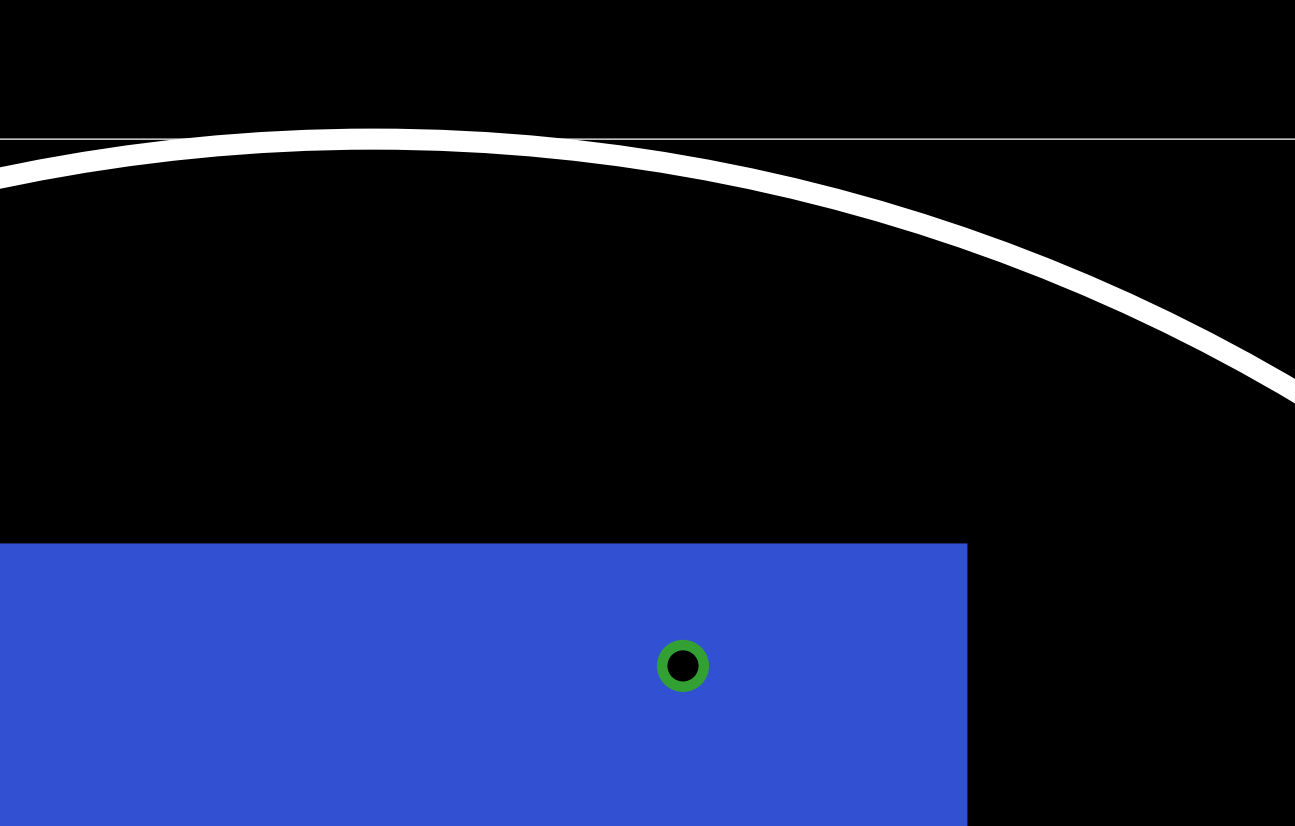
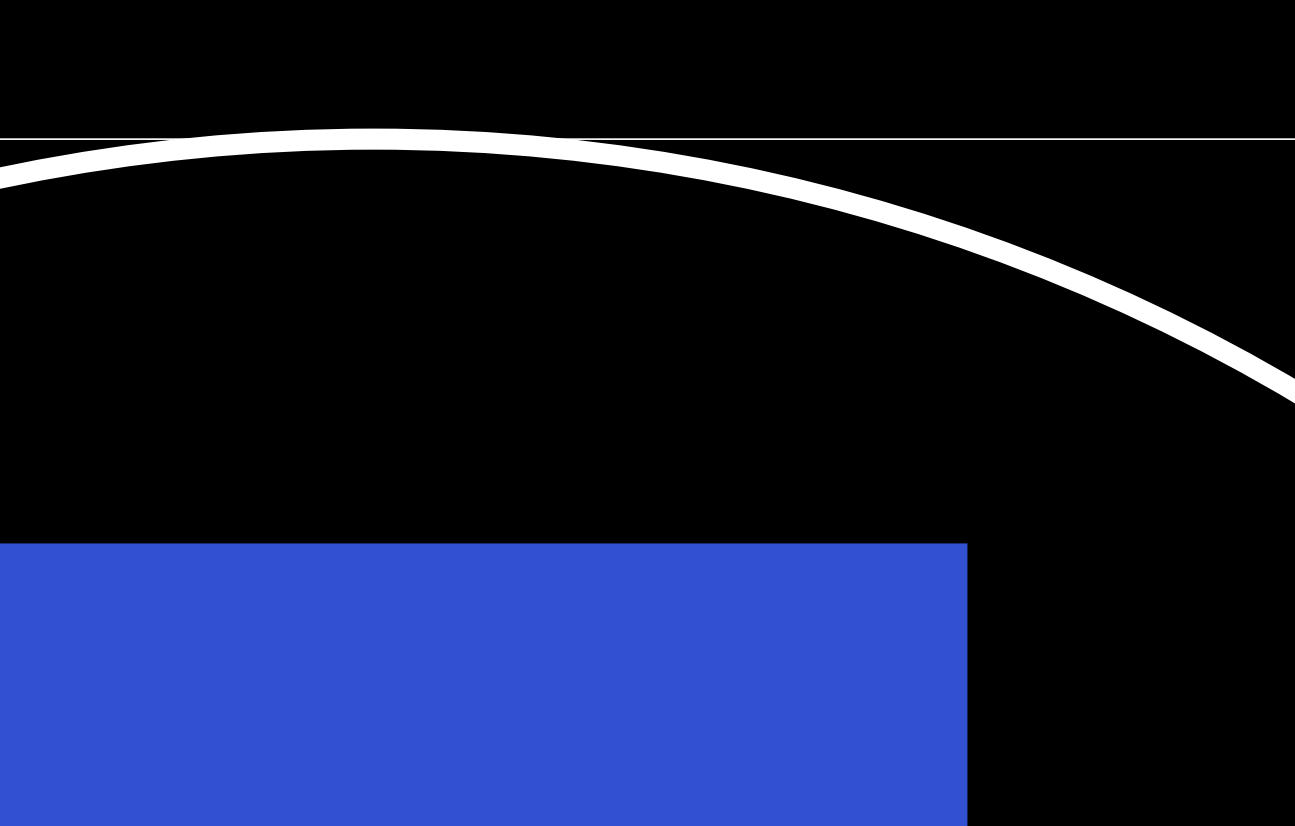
via: (682, 665) -> none

